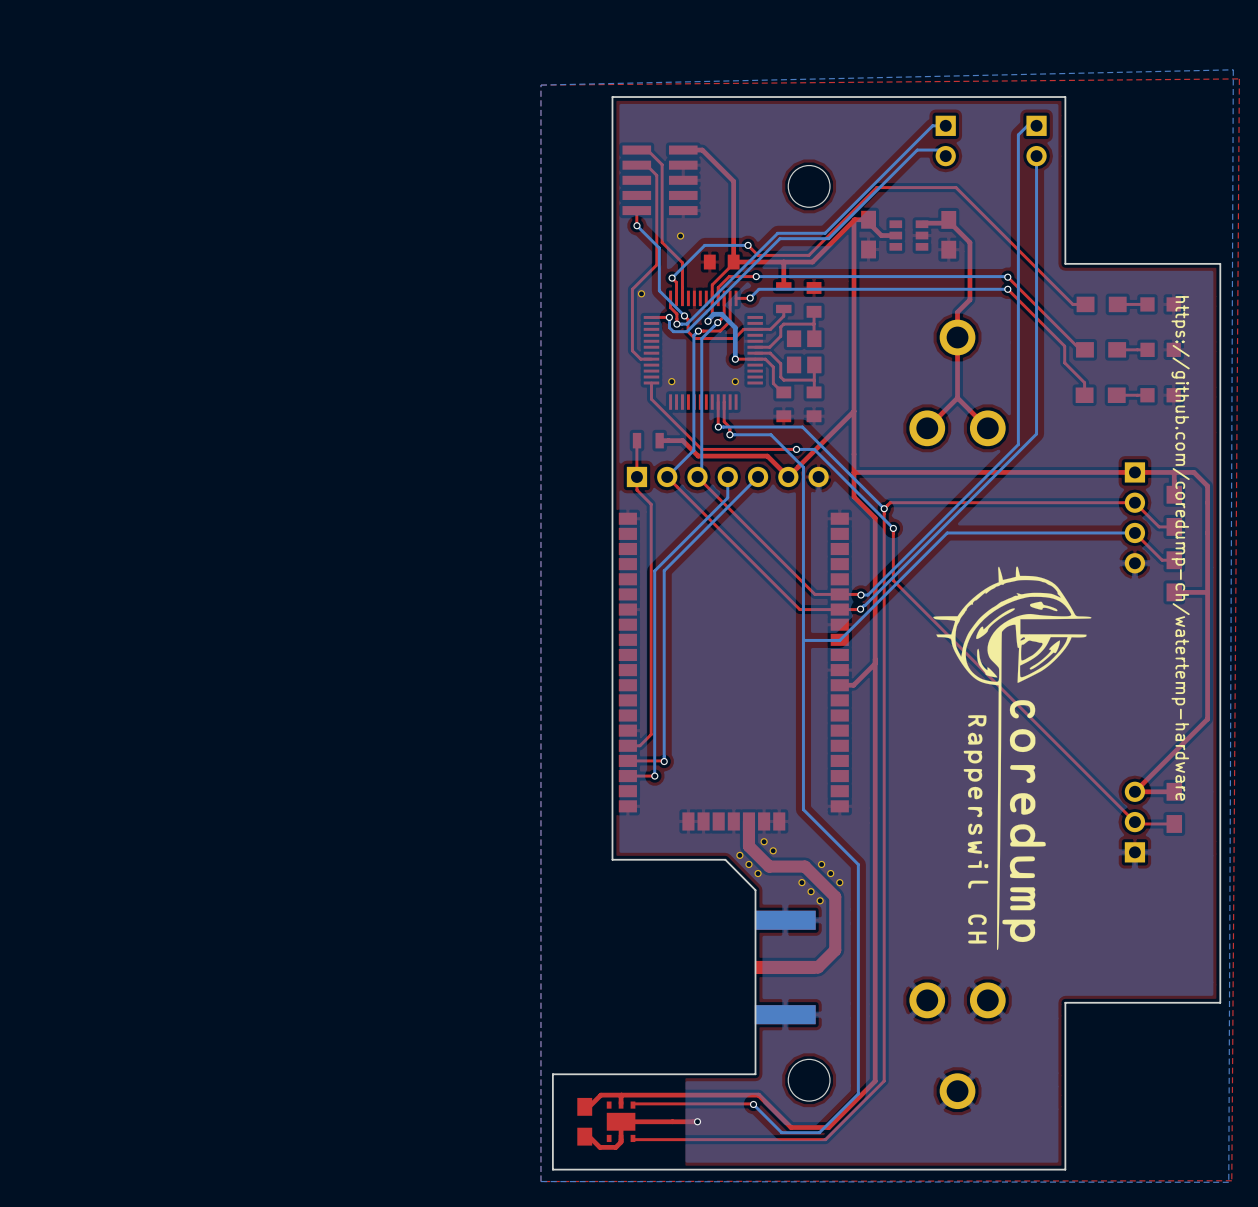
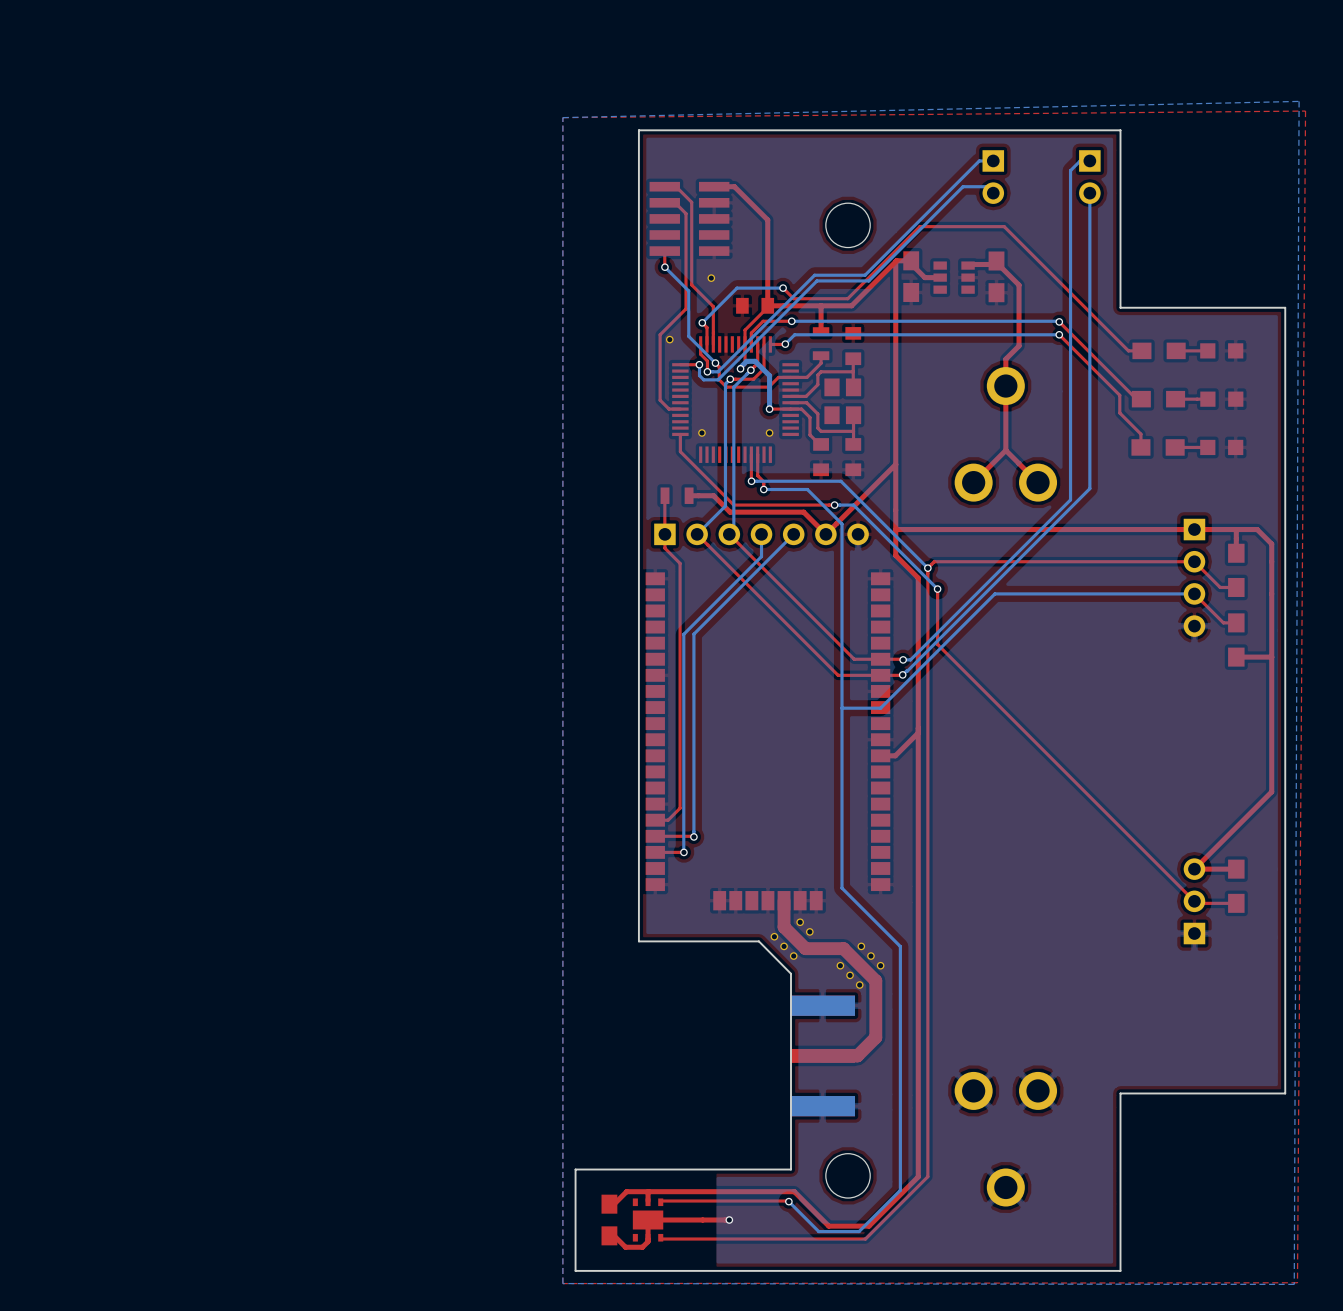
text: https://github.com/coredump-ch/watertemp-hardware (1180, 548) -> none
drawing: [933, 566, 1092, 951] -> none

